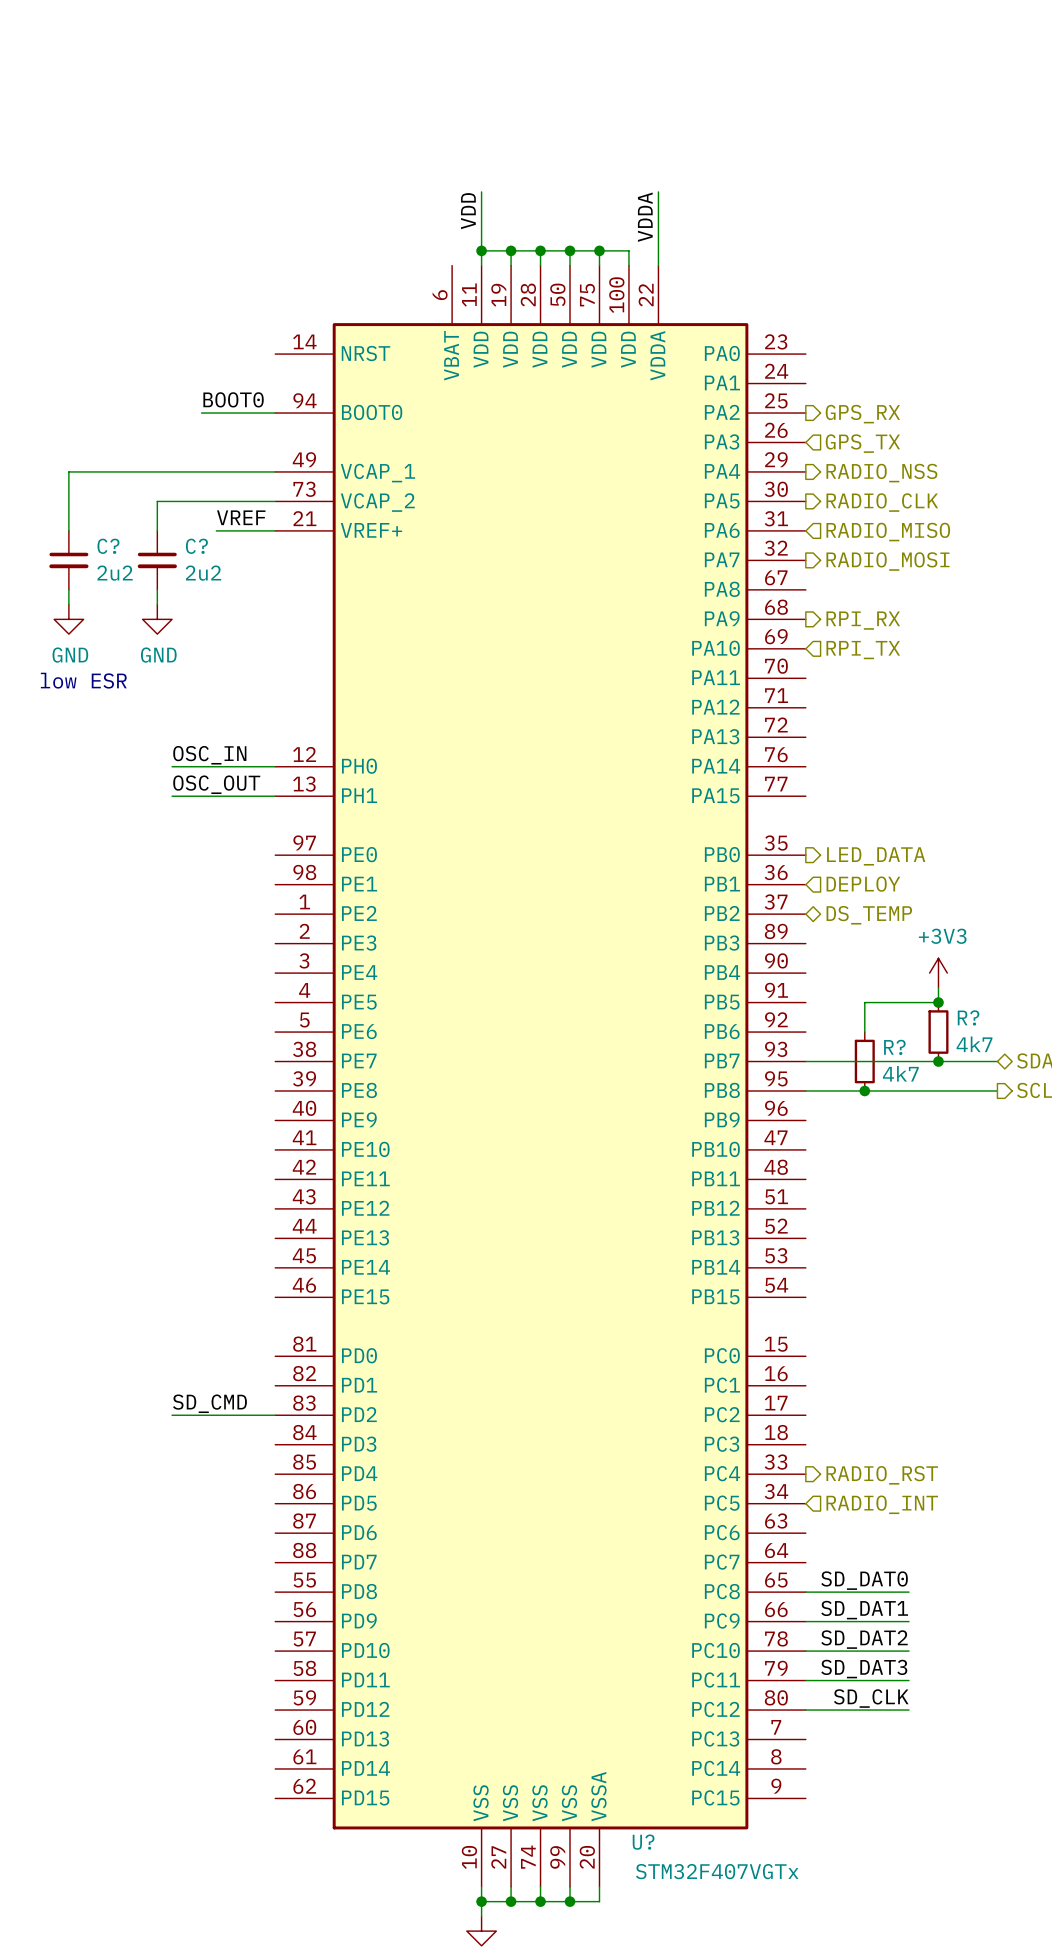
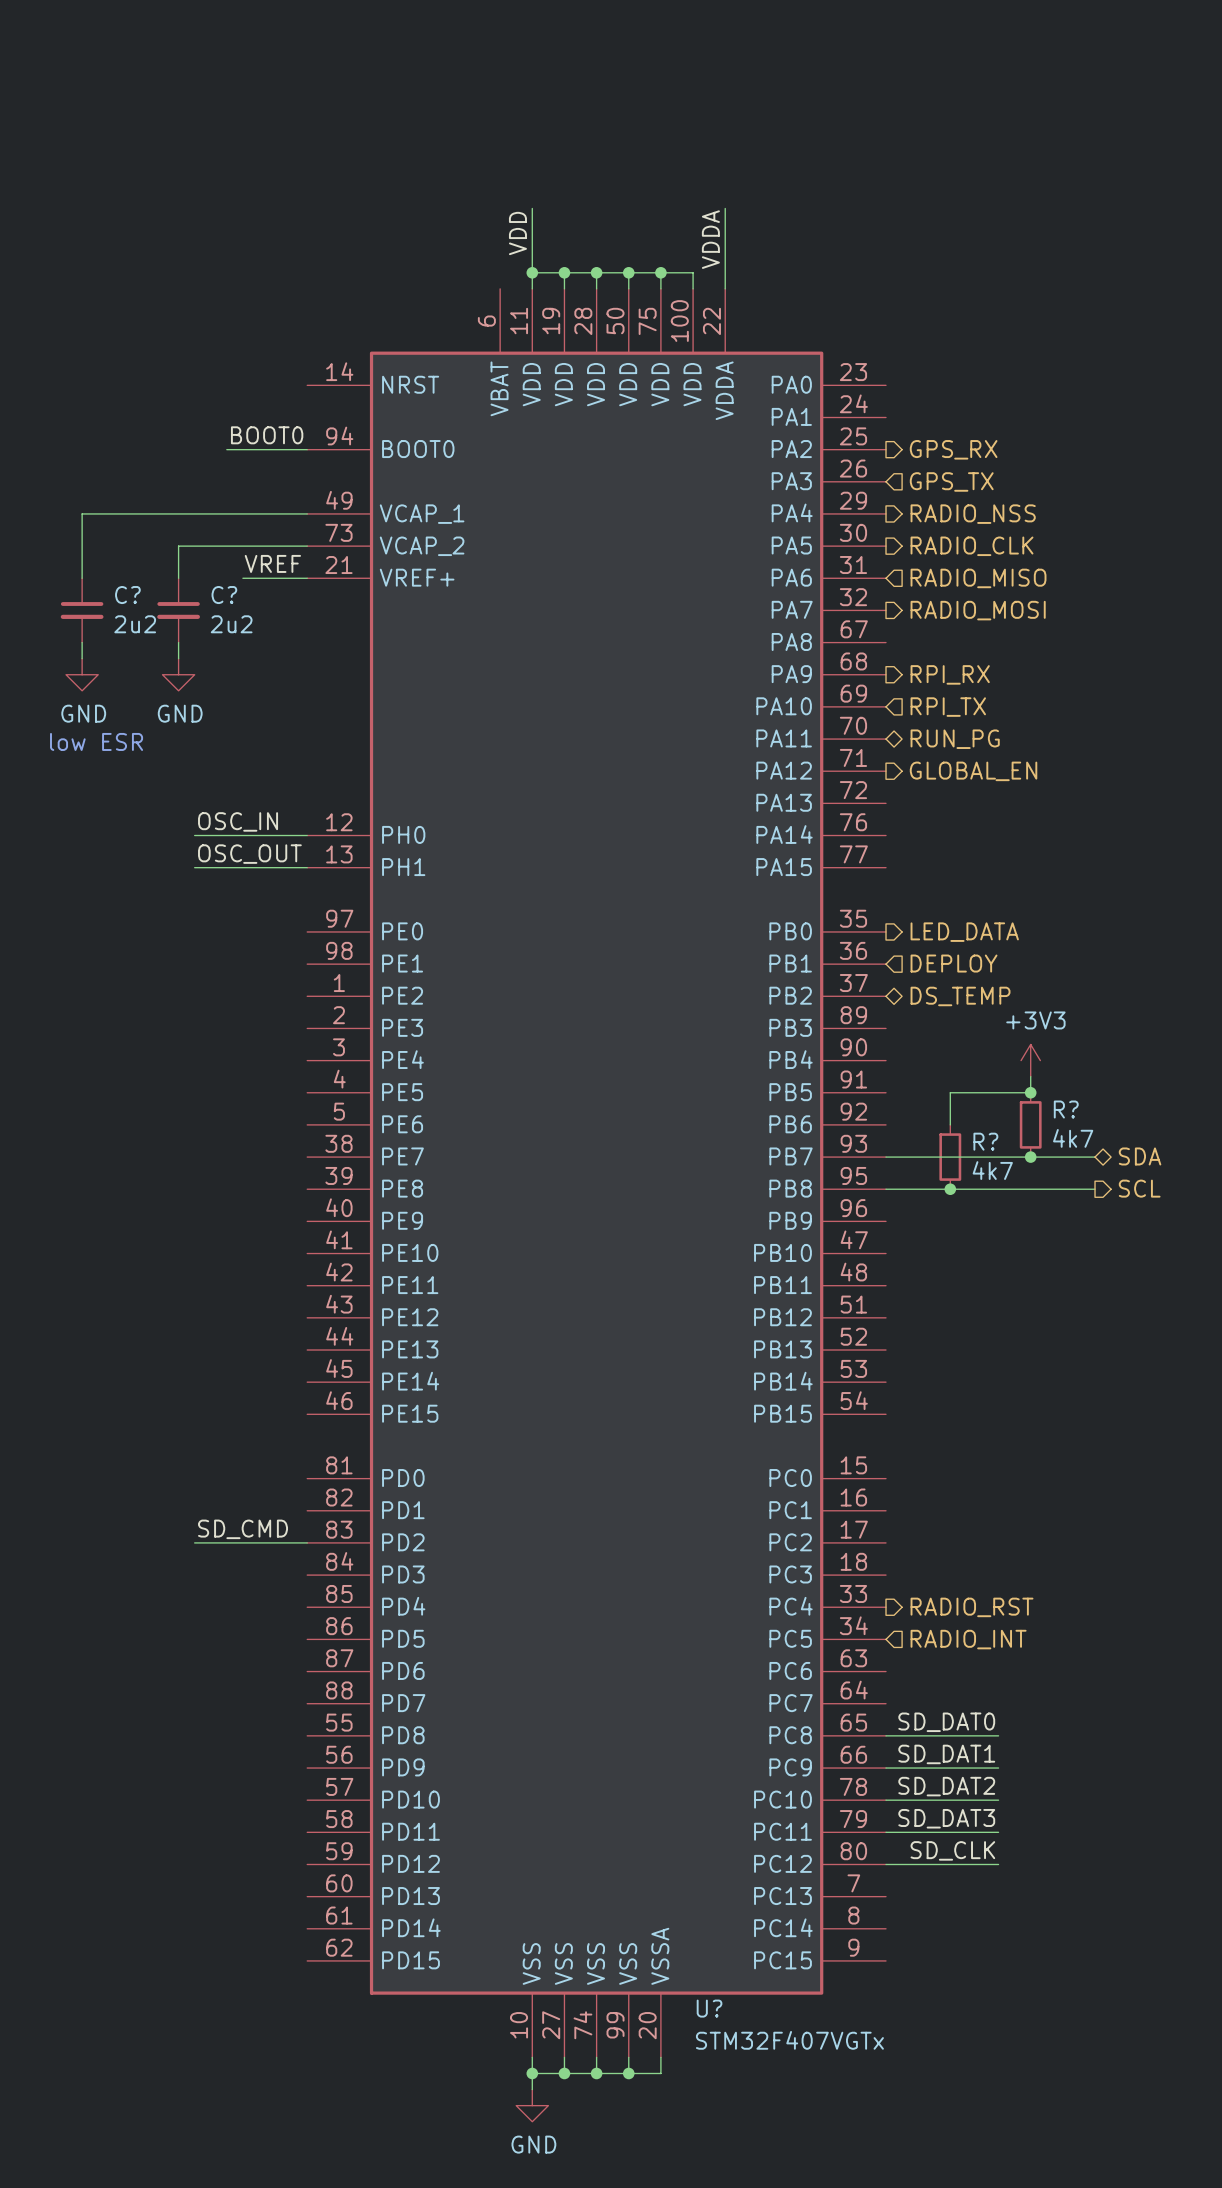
hierarchical label: none -> RUN_PG (955, 739)
hierarchical label: none -> GLOBAL_EN (973, 771)

